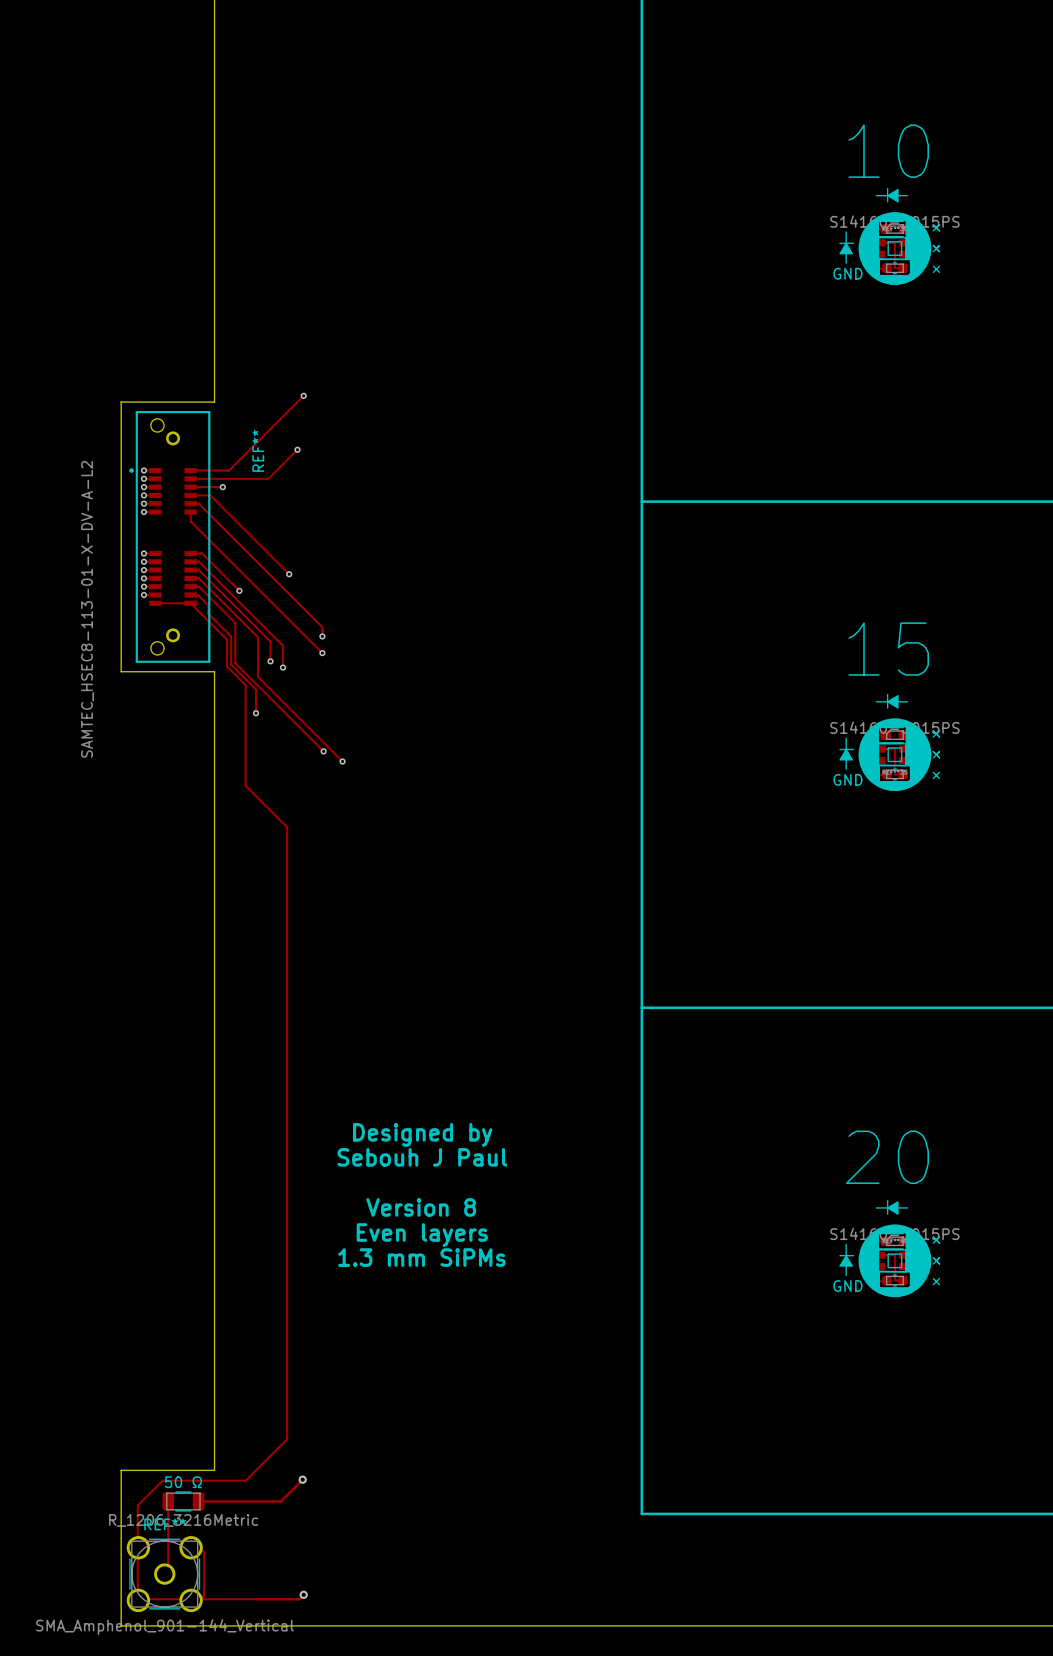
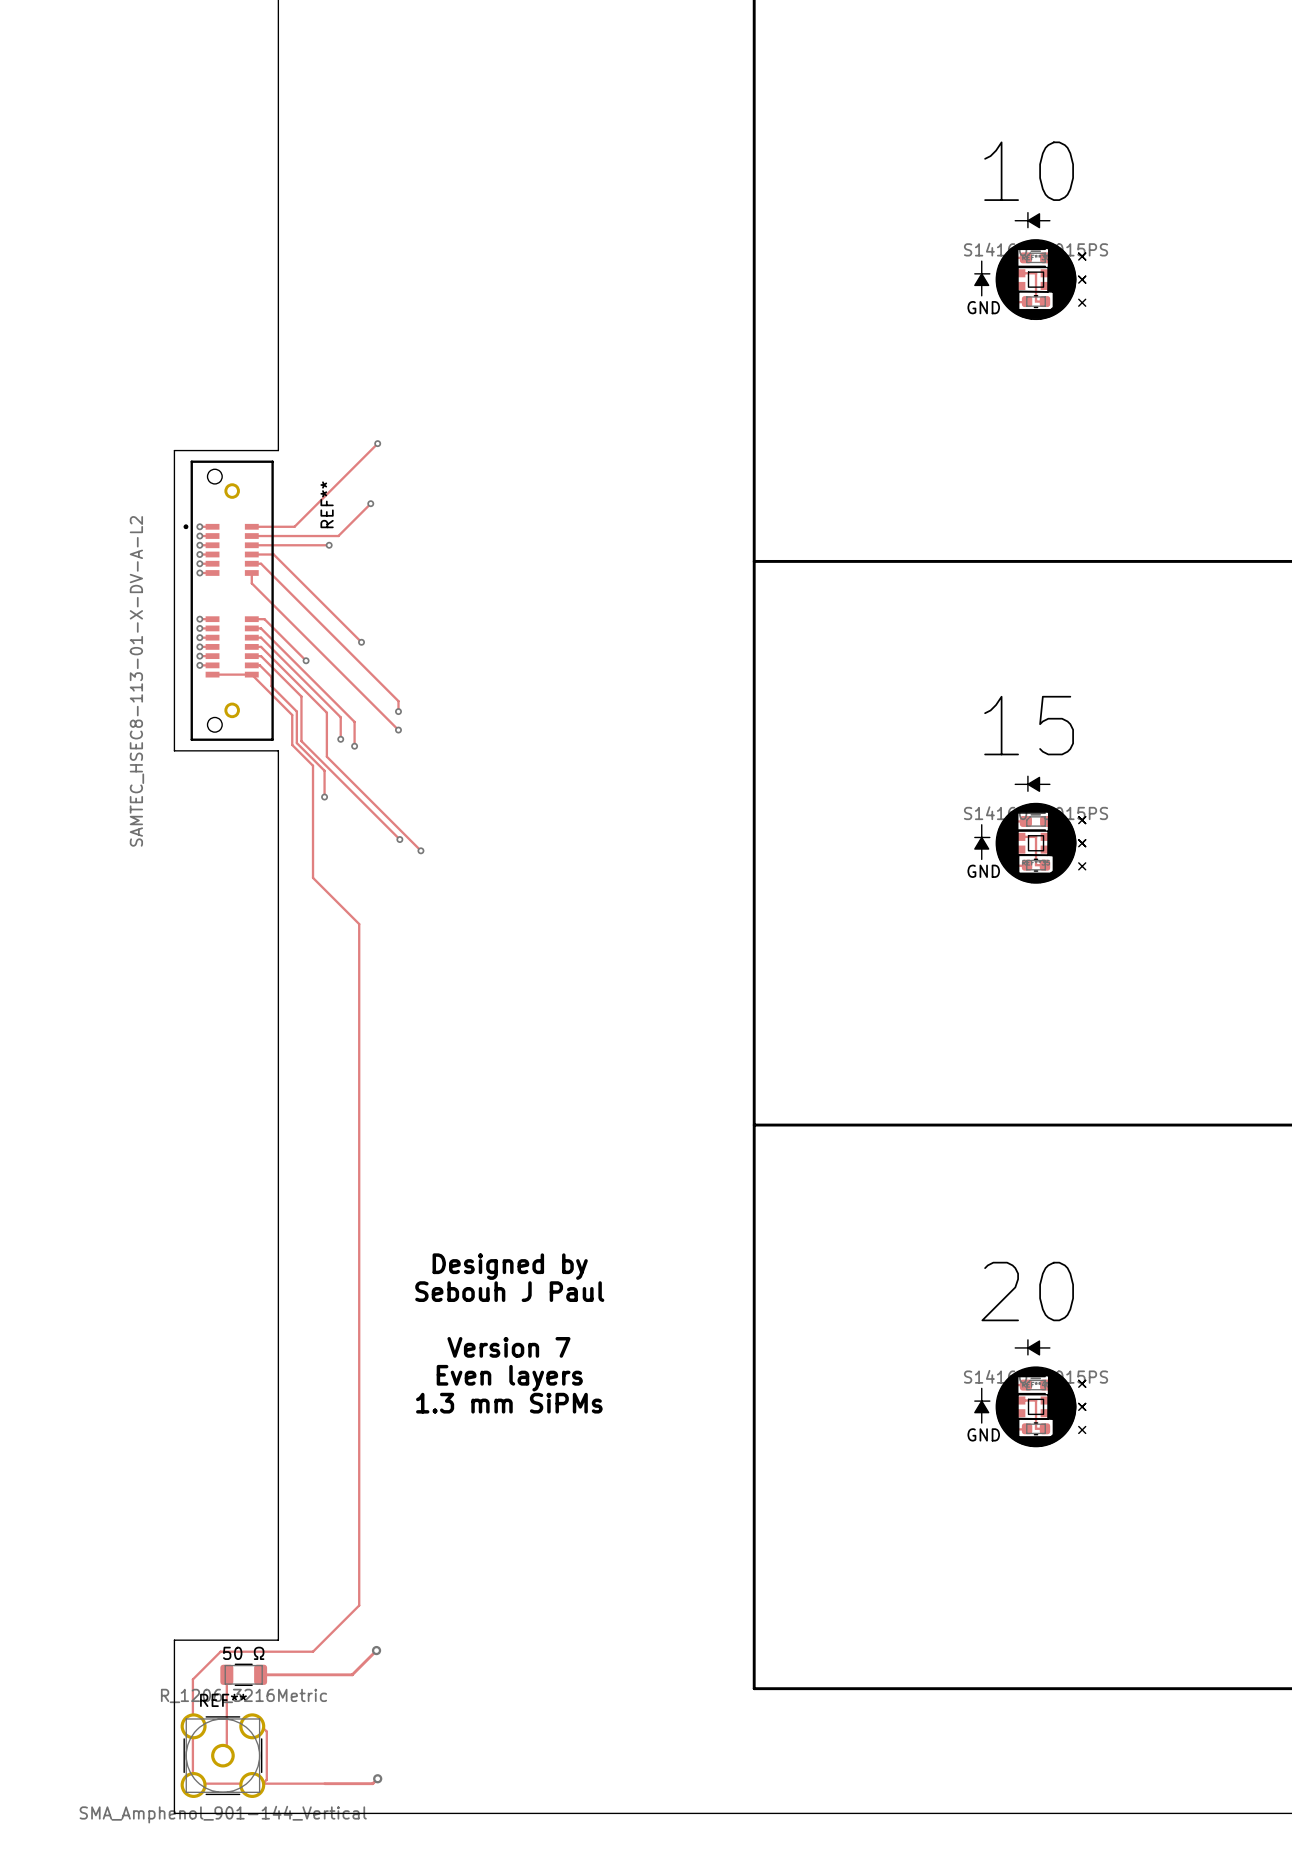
track: none -> (287, 545) (329, 545)
via position: (222, 487) -> (329, 545)
text: Version 8 (421, 1207) -> Version 7 (508, 1347)

